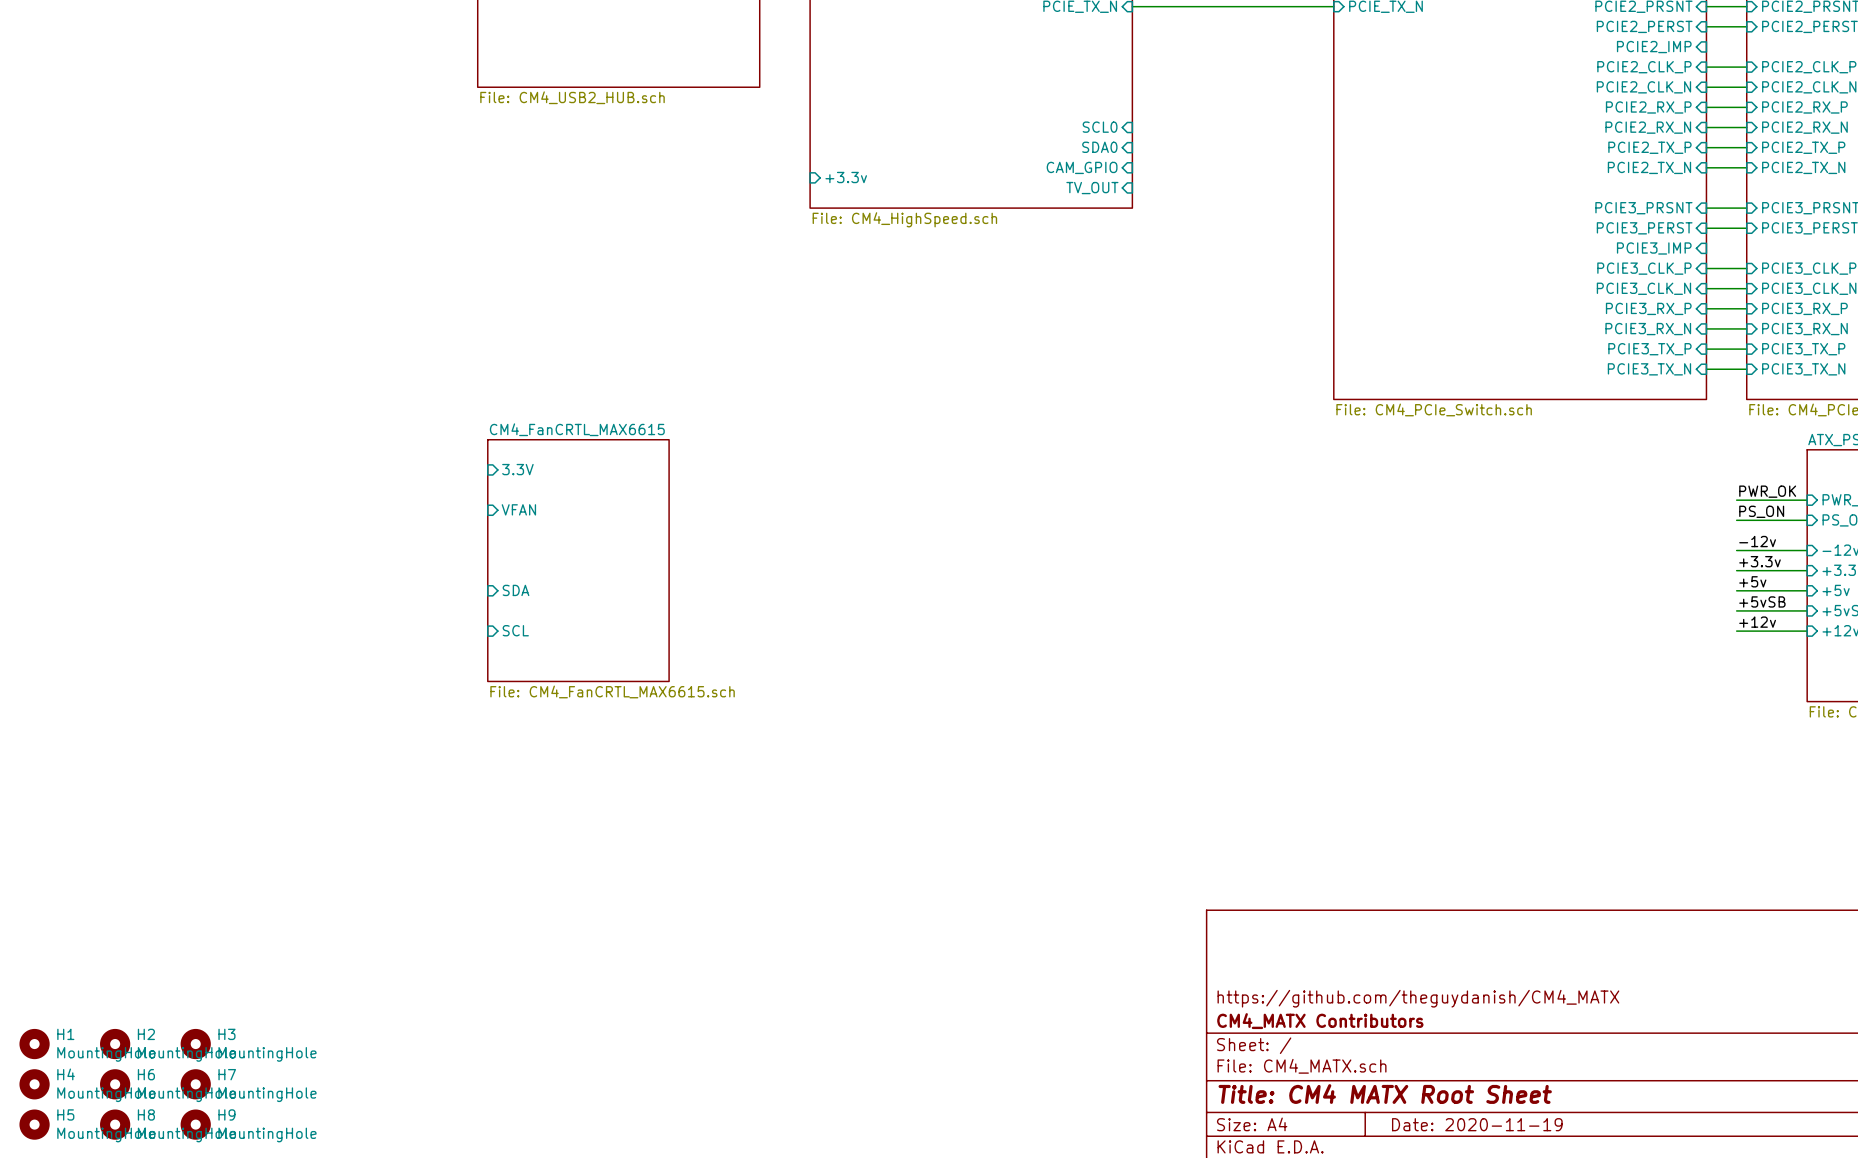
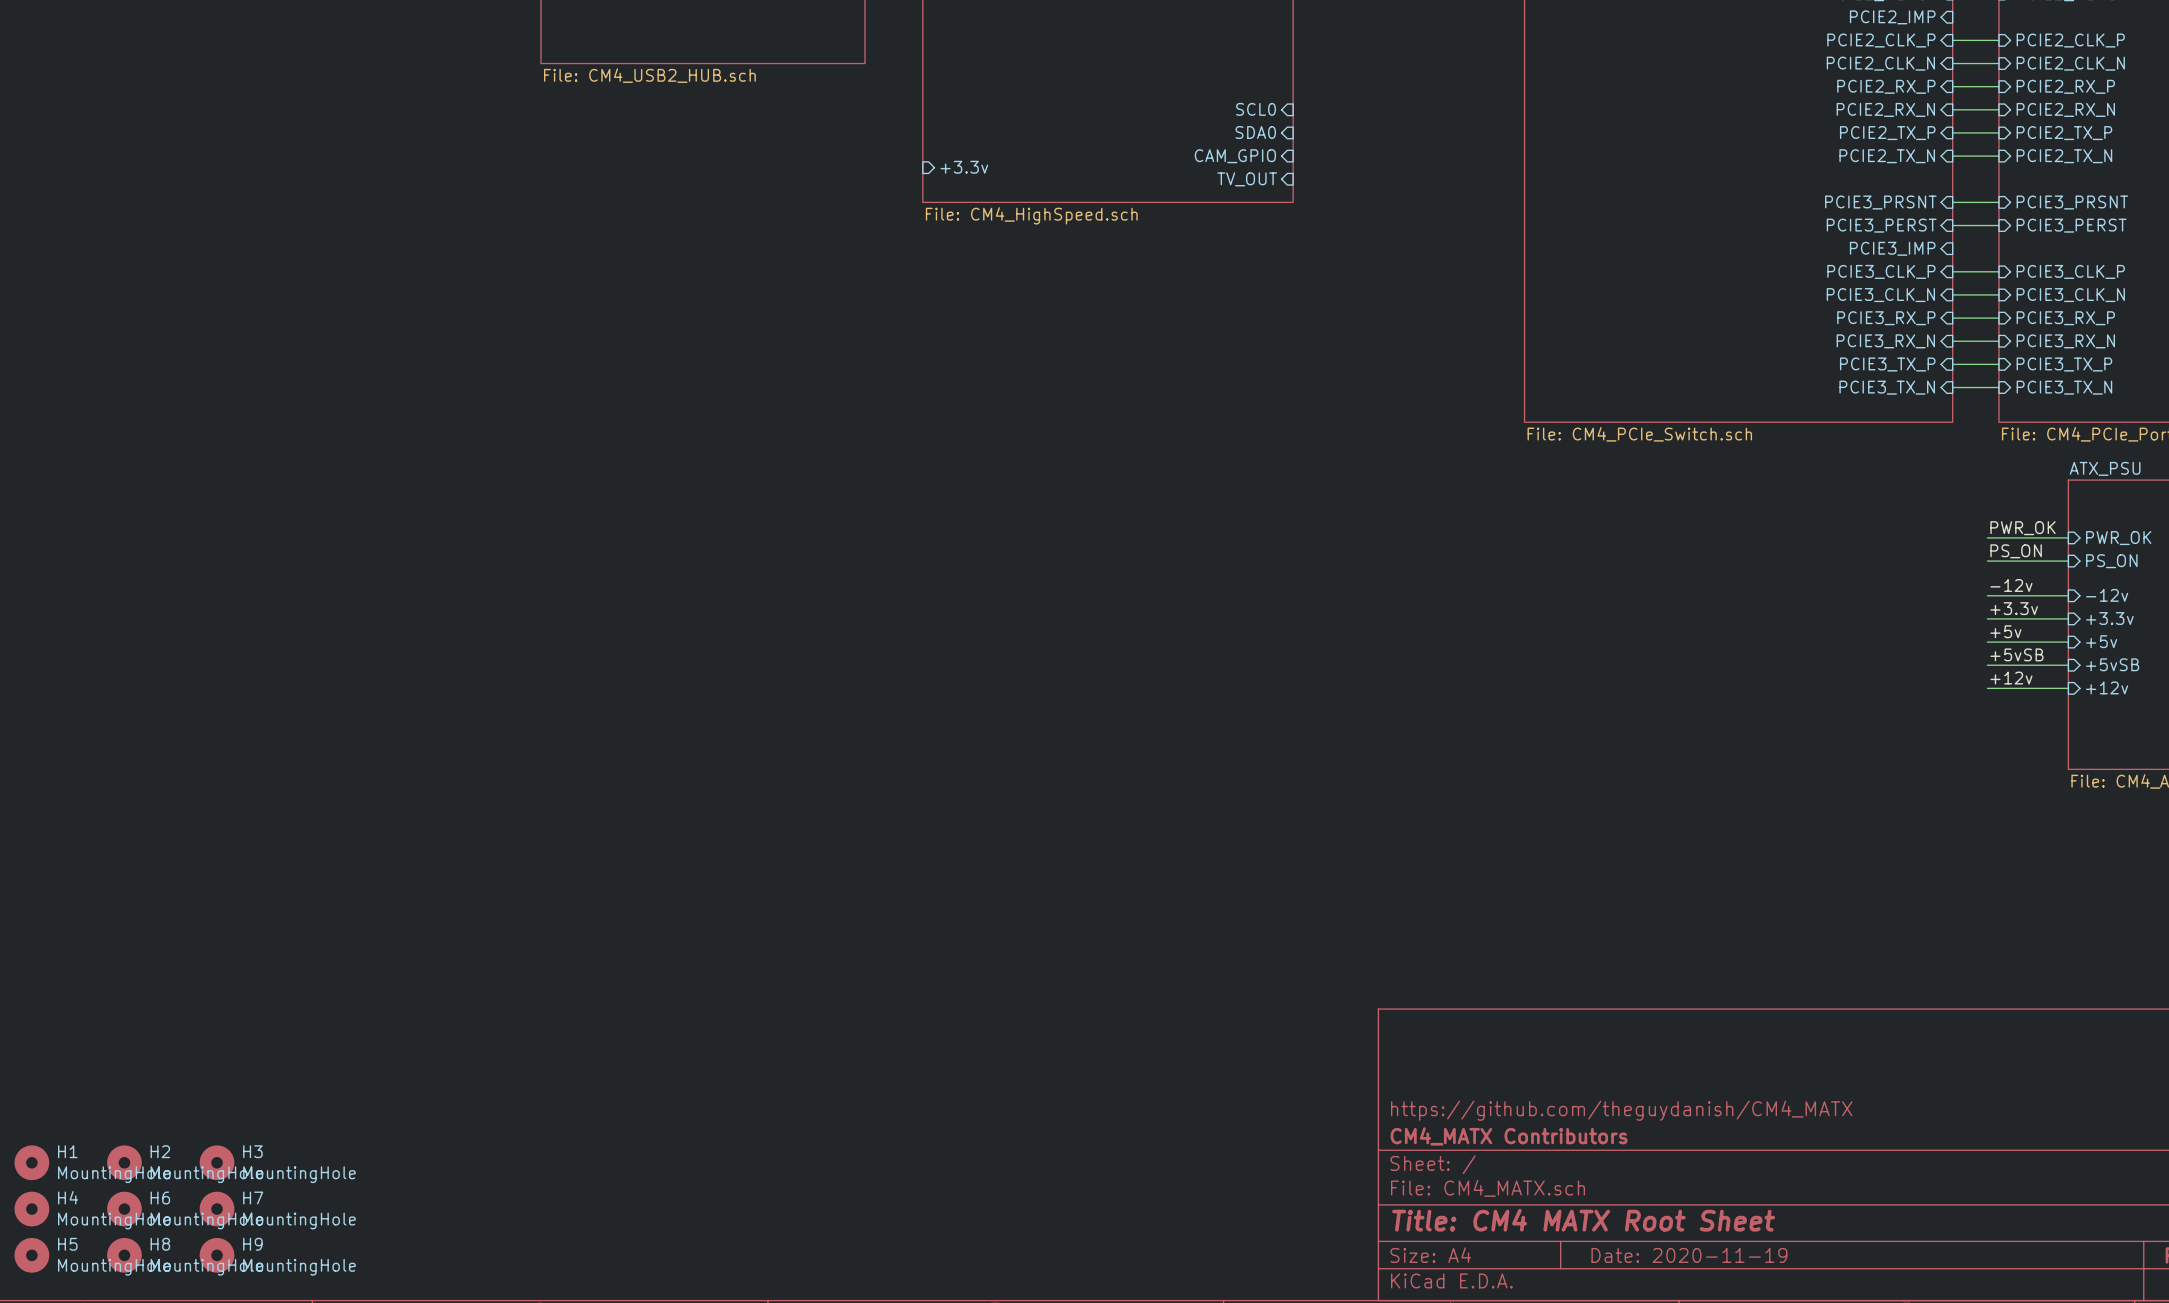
sheet pin: 3.3V (517, 469) -> none
sheet pin: VFAN (518, 509) -> none
sheet CM4_FanCRTL_MAX6615: File: CM4_FanCRTL_MAX6615.sch (578, 560) -> none
sheet pin: SDA (516, 590) -> none
sheet pin: SCL (515, 630) -> none

